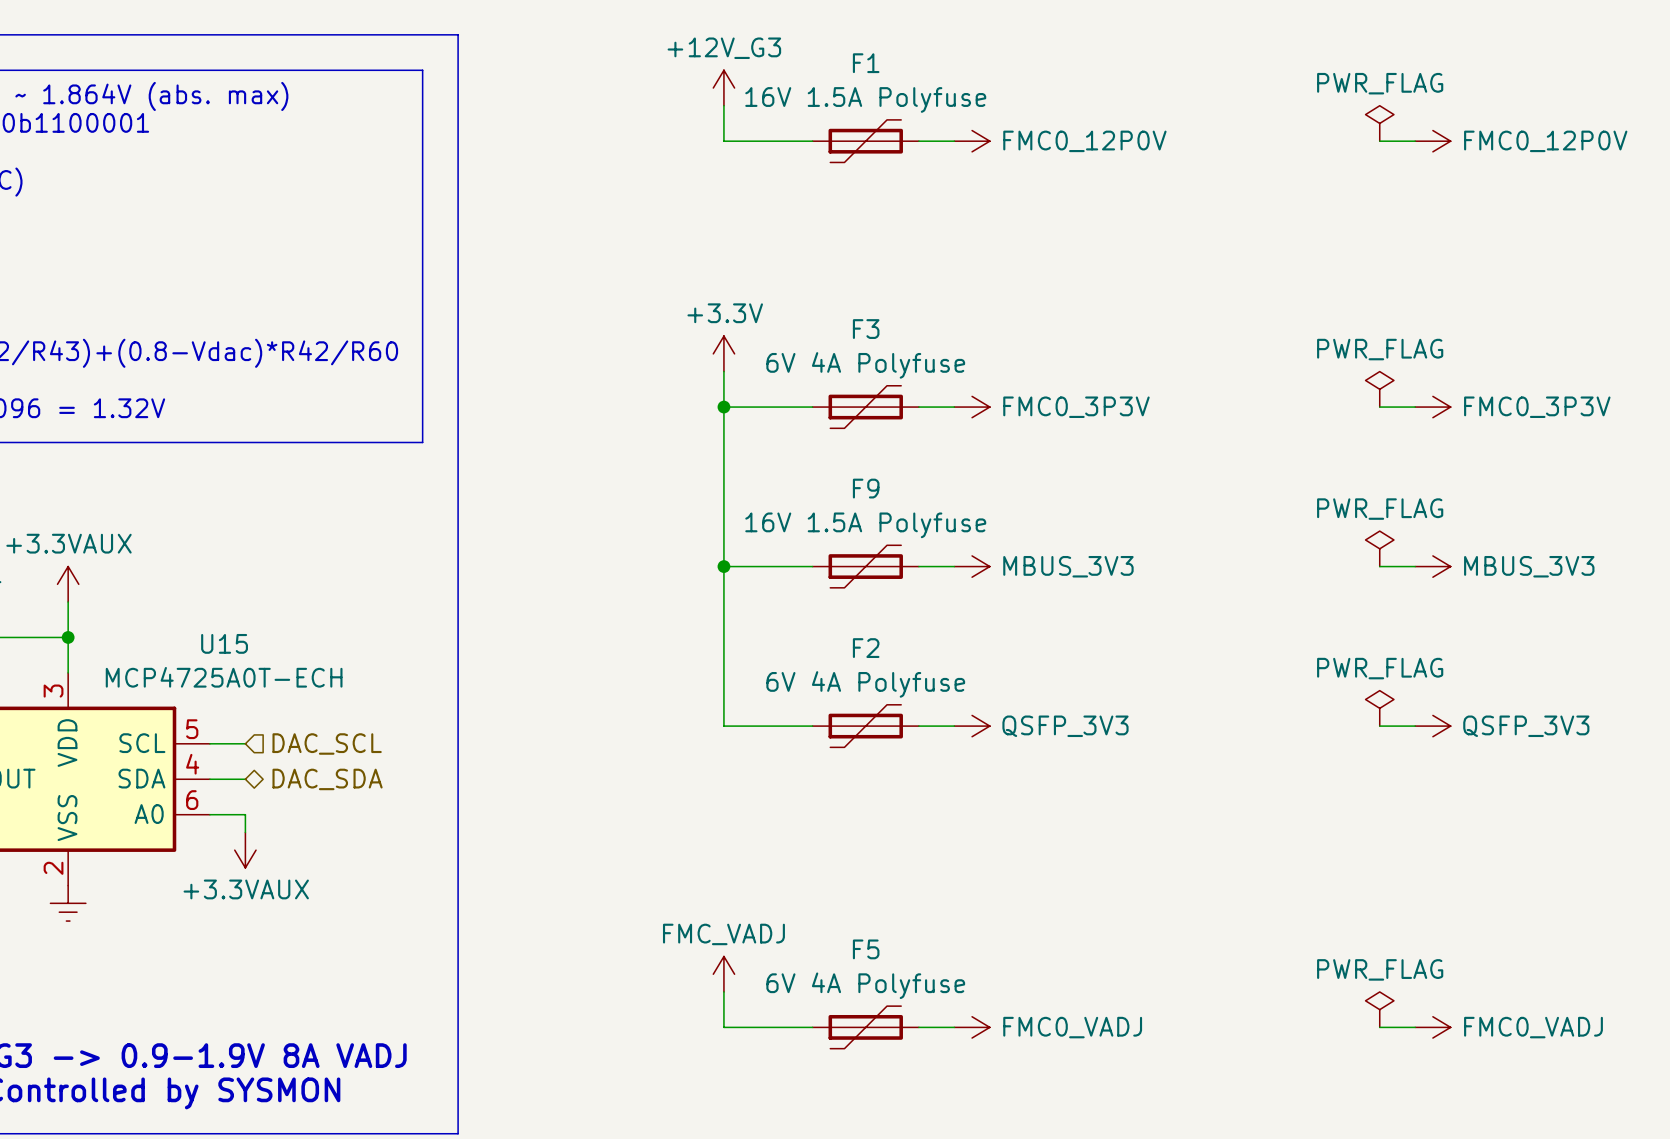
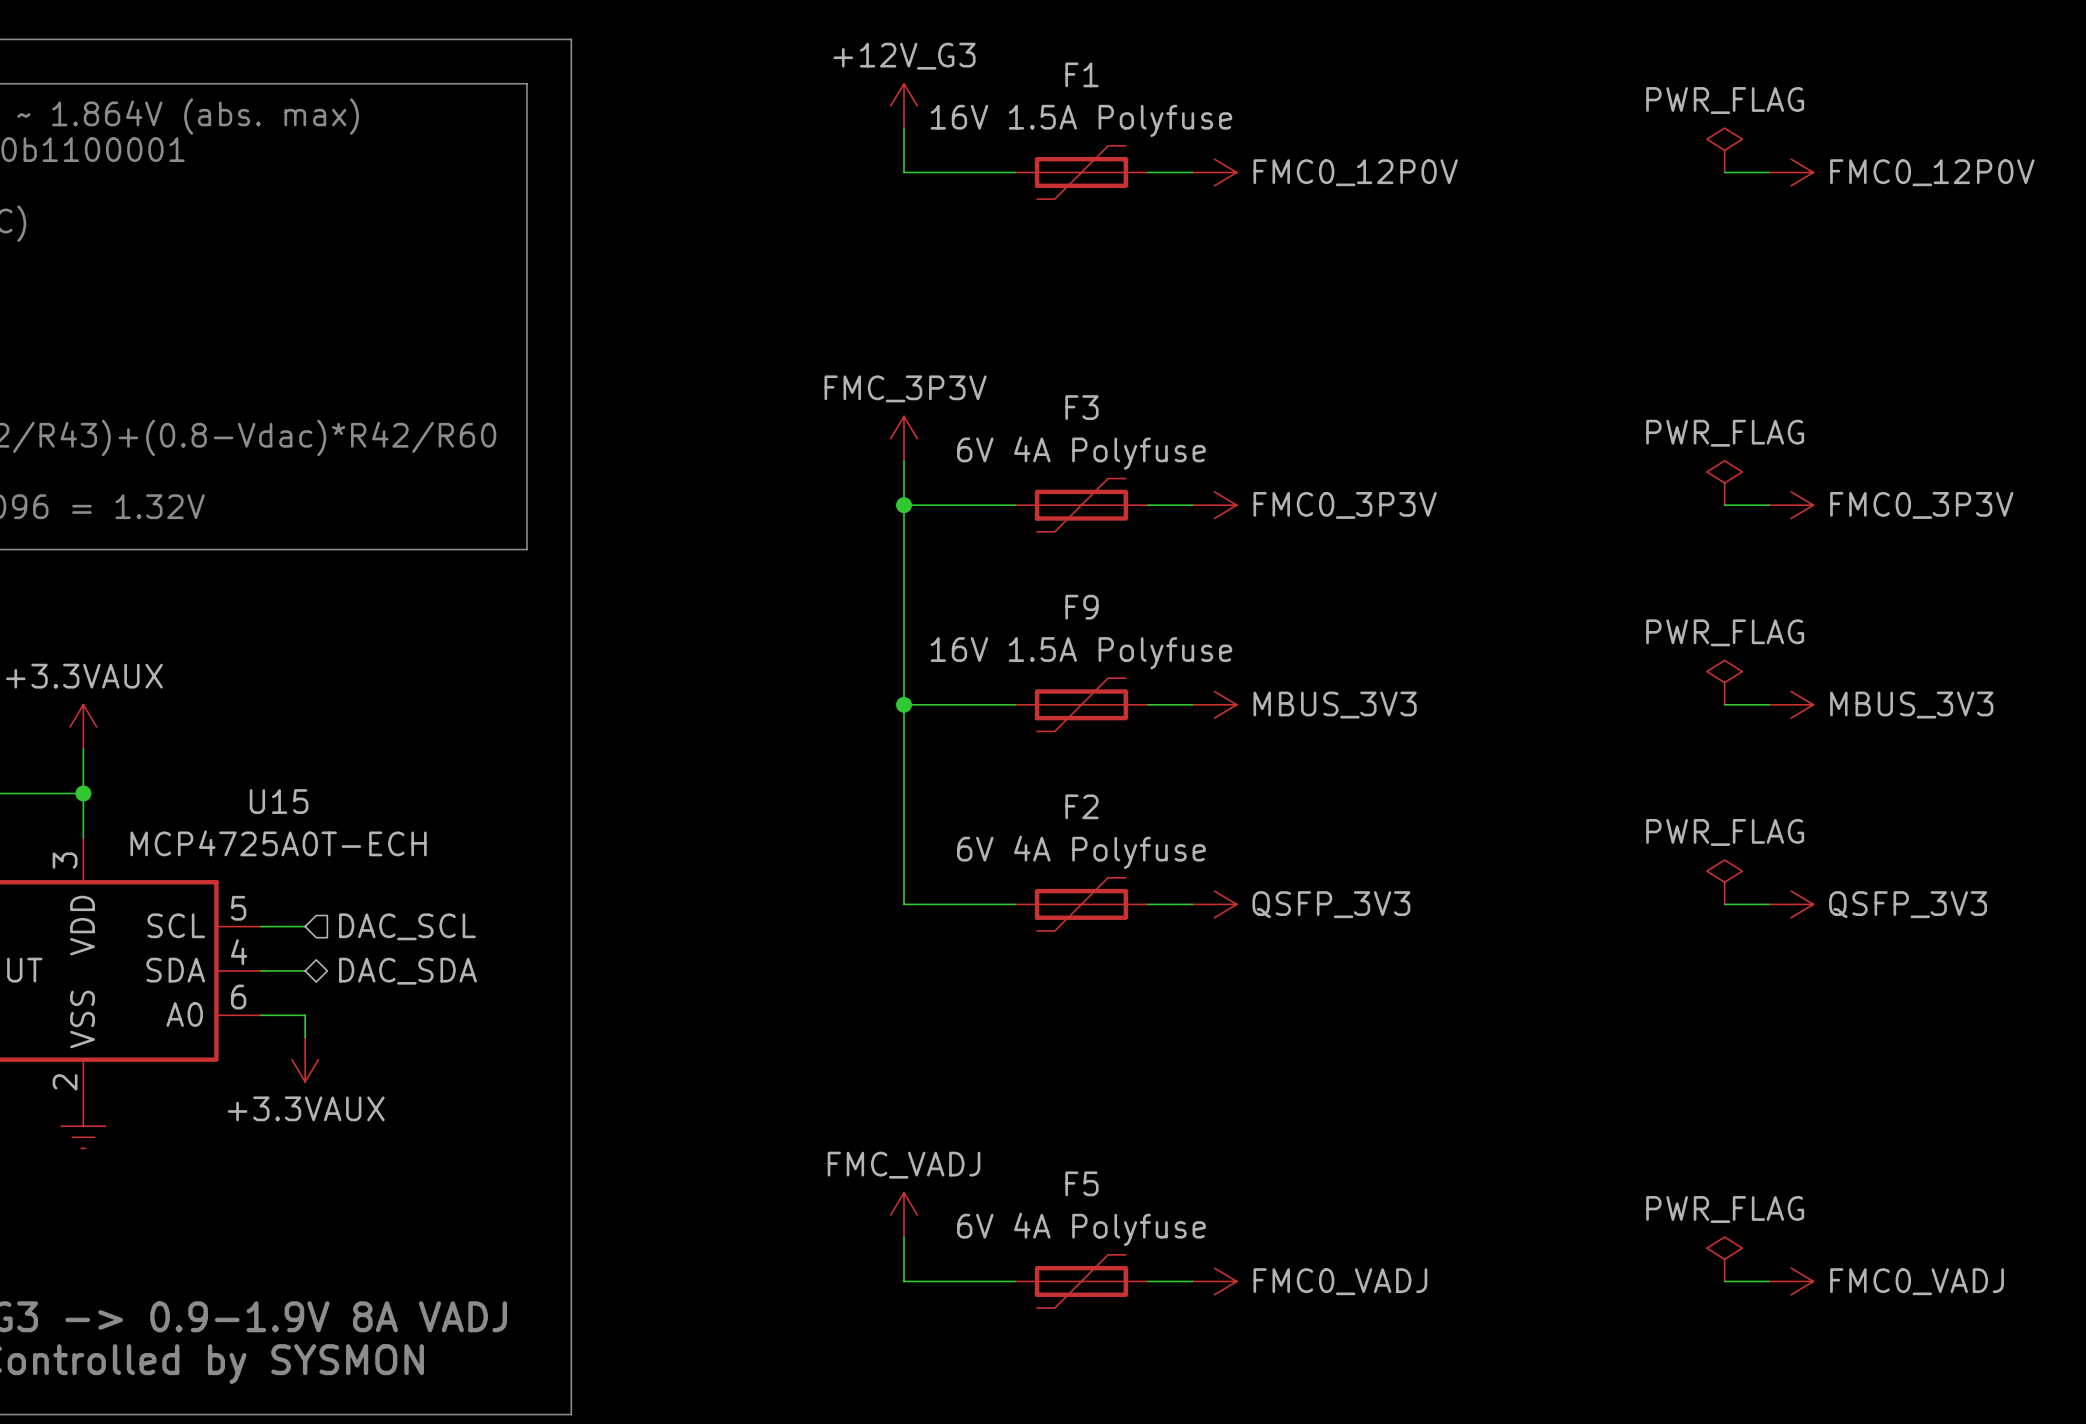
power symbol: +3.3V (723, 353) -> FMC_3P3V (904, 438)

